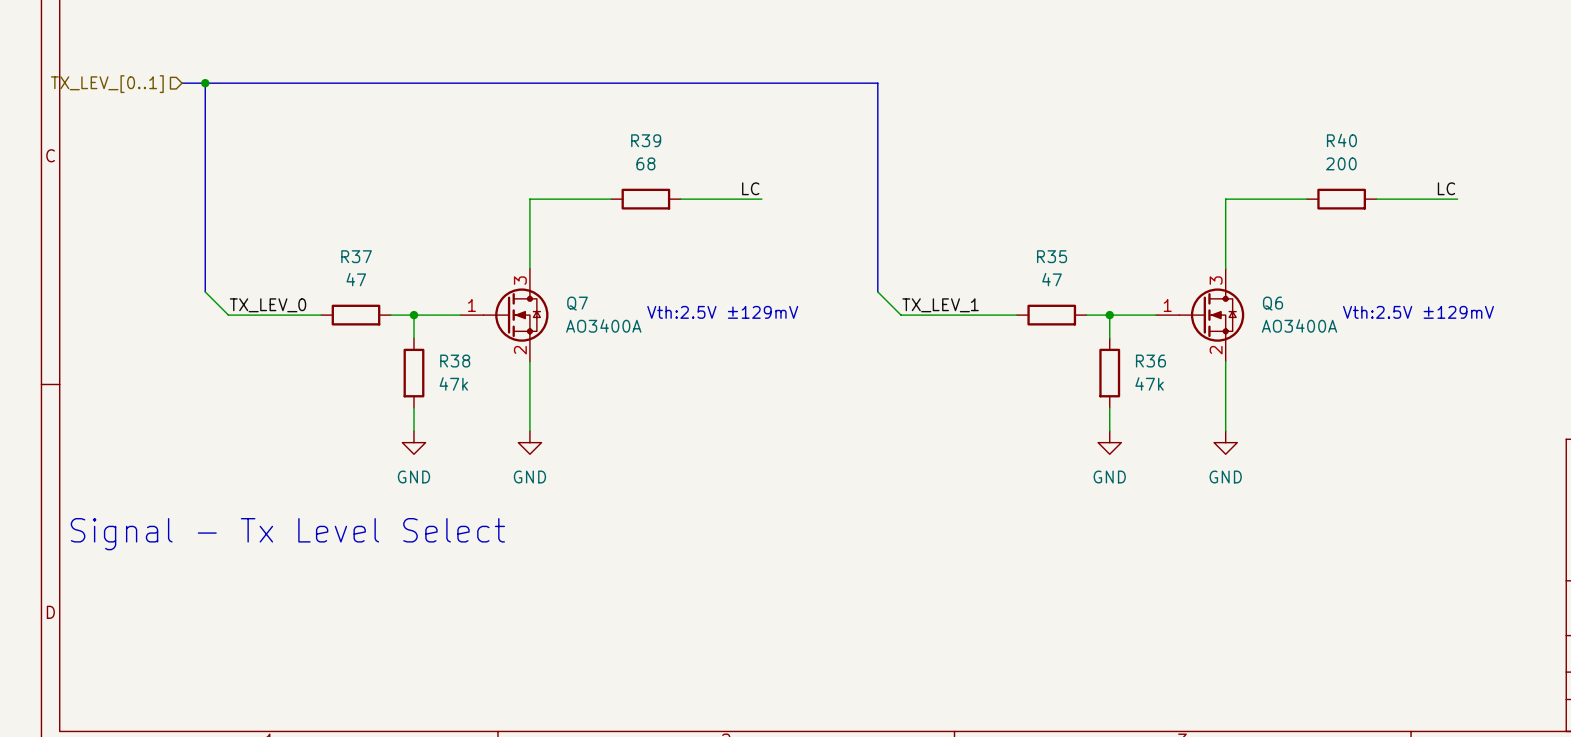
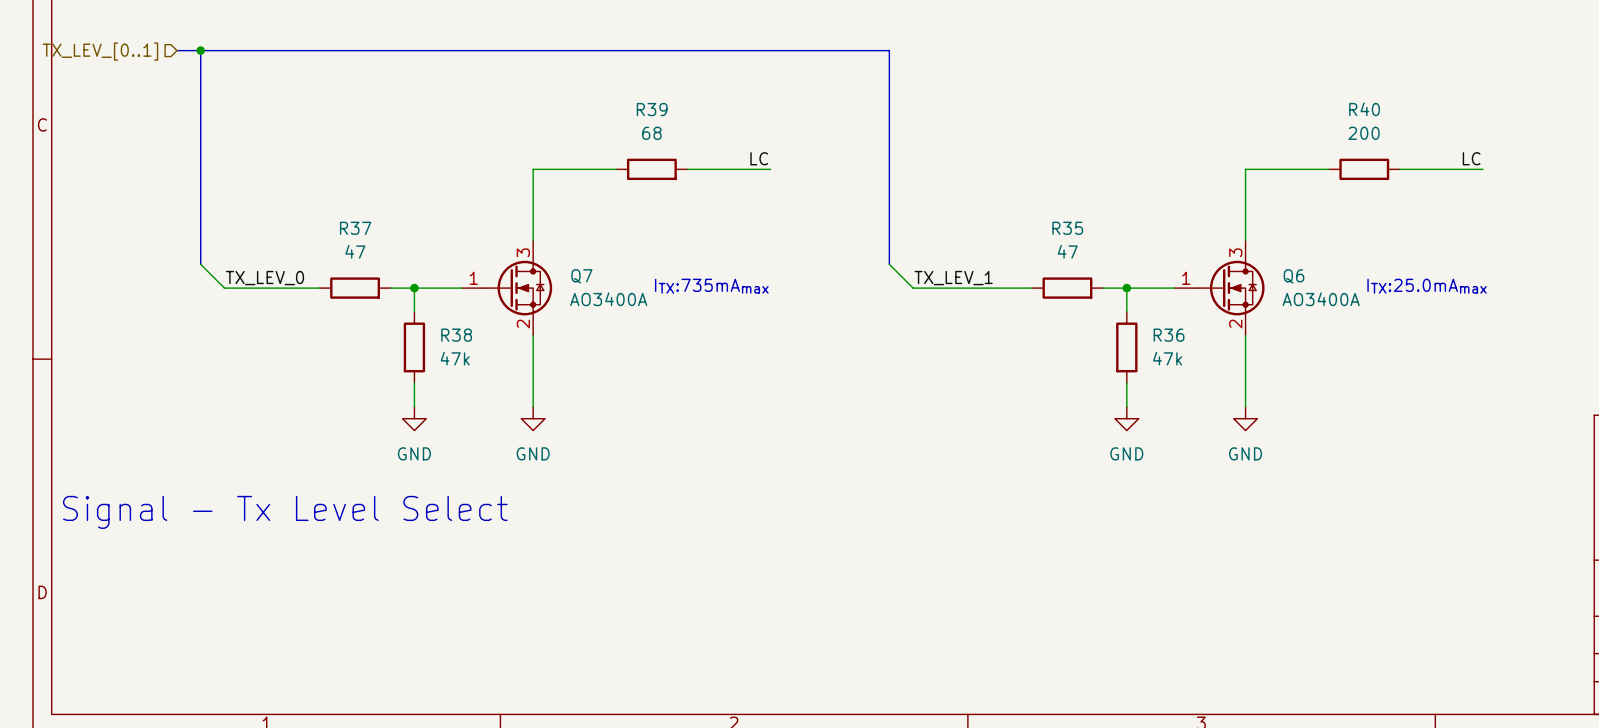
text: Vth:2.5V ±129mV (722, 312) -> ITX:735mAmax (711, 286)
text: Vth:2.5V ±129mV (1418, 312) -> ITX:25.0mAmax (1427, 286)

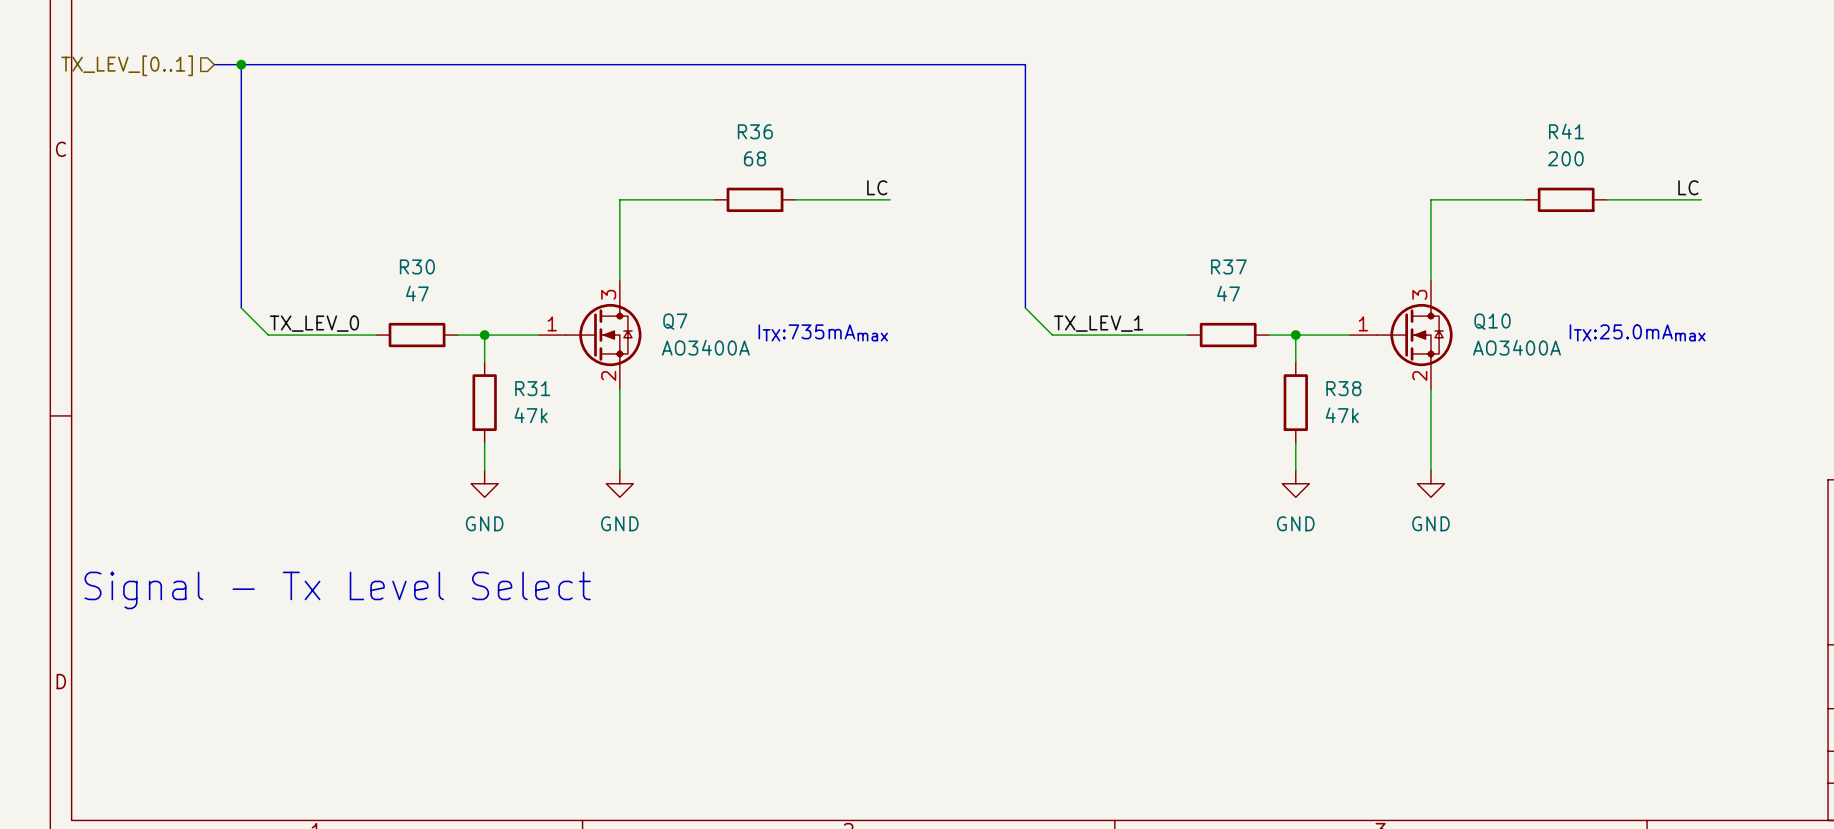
R39 name: R39 (652, 109) -> R36 (755, 131)
R40 name: R40 (1364, 109) -> R41 (1566, 131)
R37 name: R37 (355, 228) -> R30 (417, 266)
R35 name: R35 (1067, 228) -> R37 (1228, 266)
Q6 name: Q6 (1293, 276) -> Q10 (1492, 321)
R38 name: R38 (456, 335) -> R31 (532, 388)
R36 name: R36 (1169, 335) -> R38 (1343, 388)

